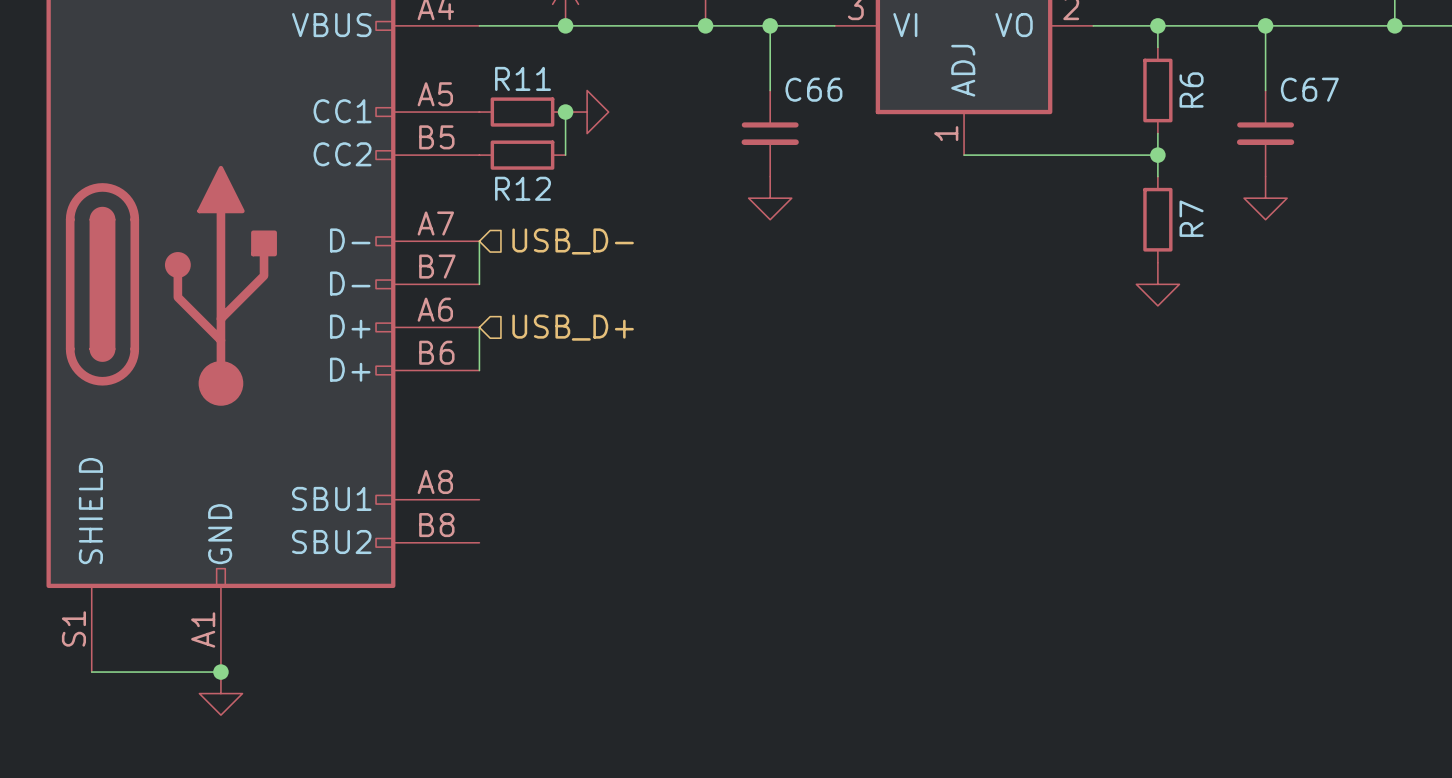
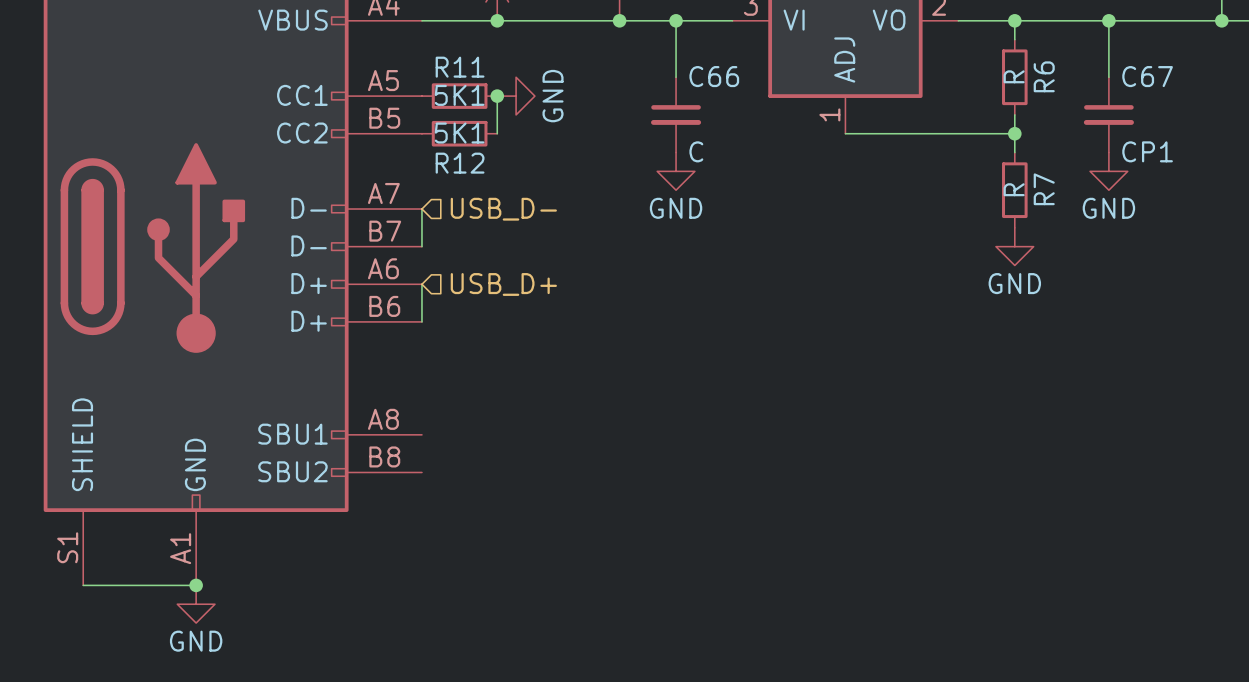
R6 value: none -> R (1014, 76)
R11 value: none -> 5K1 (459, 95)
power symbol text: none -> GND (553, 96)
R12 value: none -> 5K1 (459, 133)
C66 value: none -> C (696, 151)
C67 value: none -> CP1 (1147, 151)
R7 value: none -> R (1014, 189)
power symbol text: none -> GND (676, 208)
power symbol text: none -> GND (1108, 208)
power symbol text: none -> GND (1014, 283)
power symbol text: none -> GND (196, 641)

